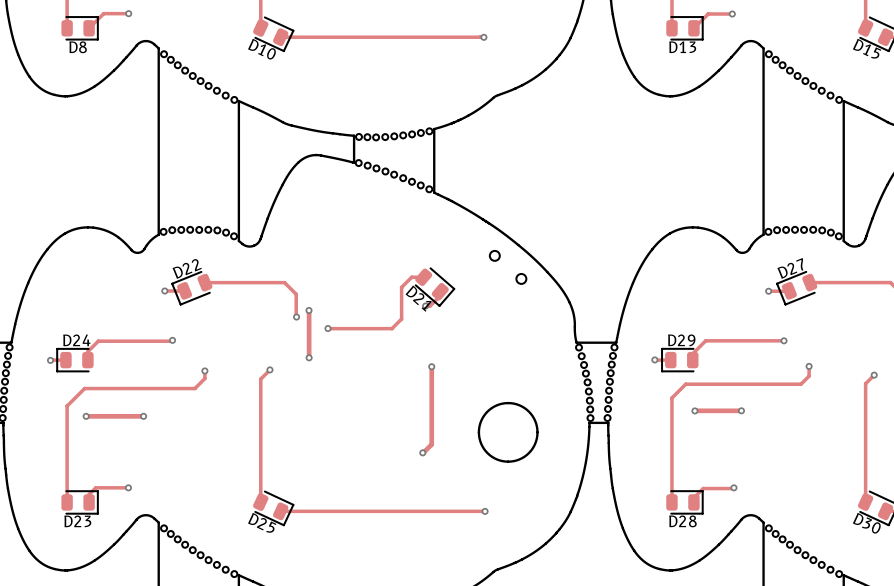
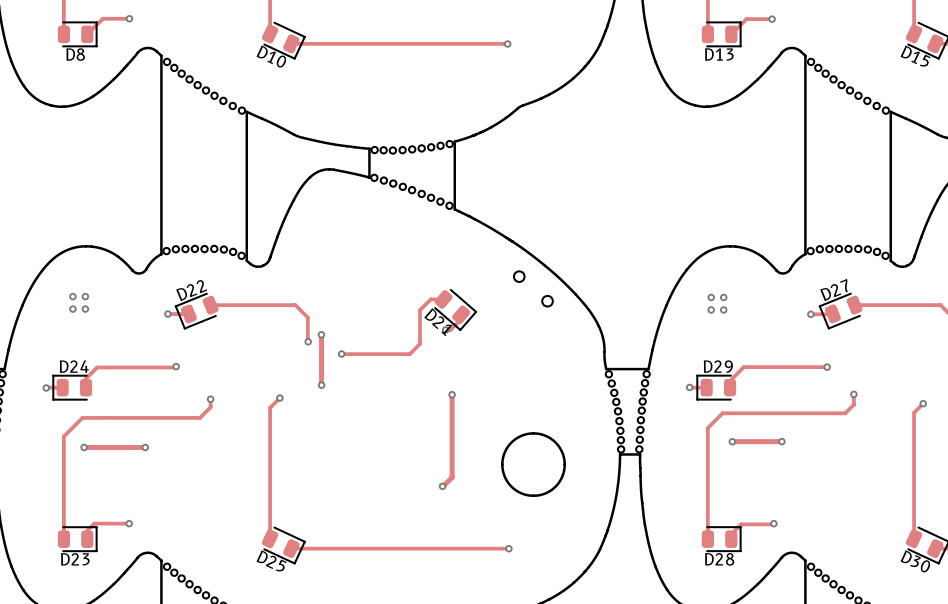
via: none -> (72, 296)
via: none -> (85, 296)
via: none -> (711, 297)
via: none -> (723, 297)
via: none -> (72, 309)
via: none -> (85, 309)
via: none -> (711, 309)
via: none -> (723, 309)

